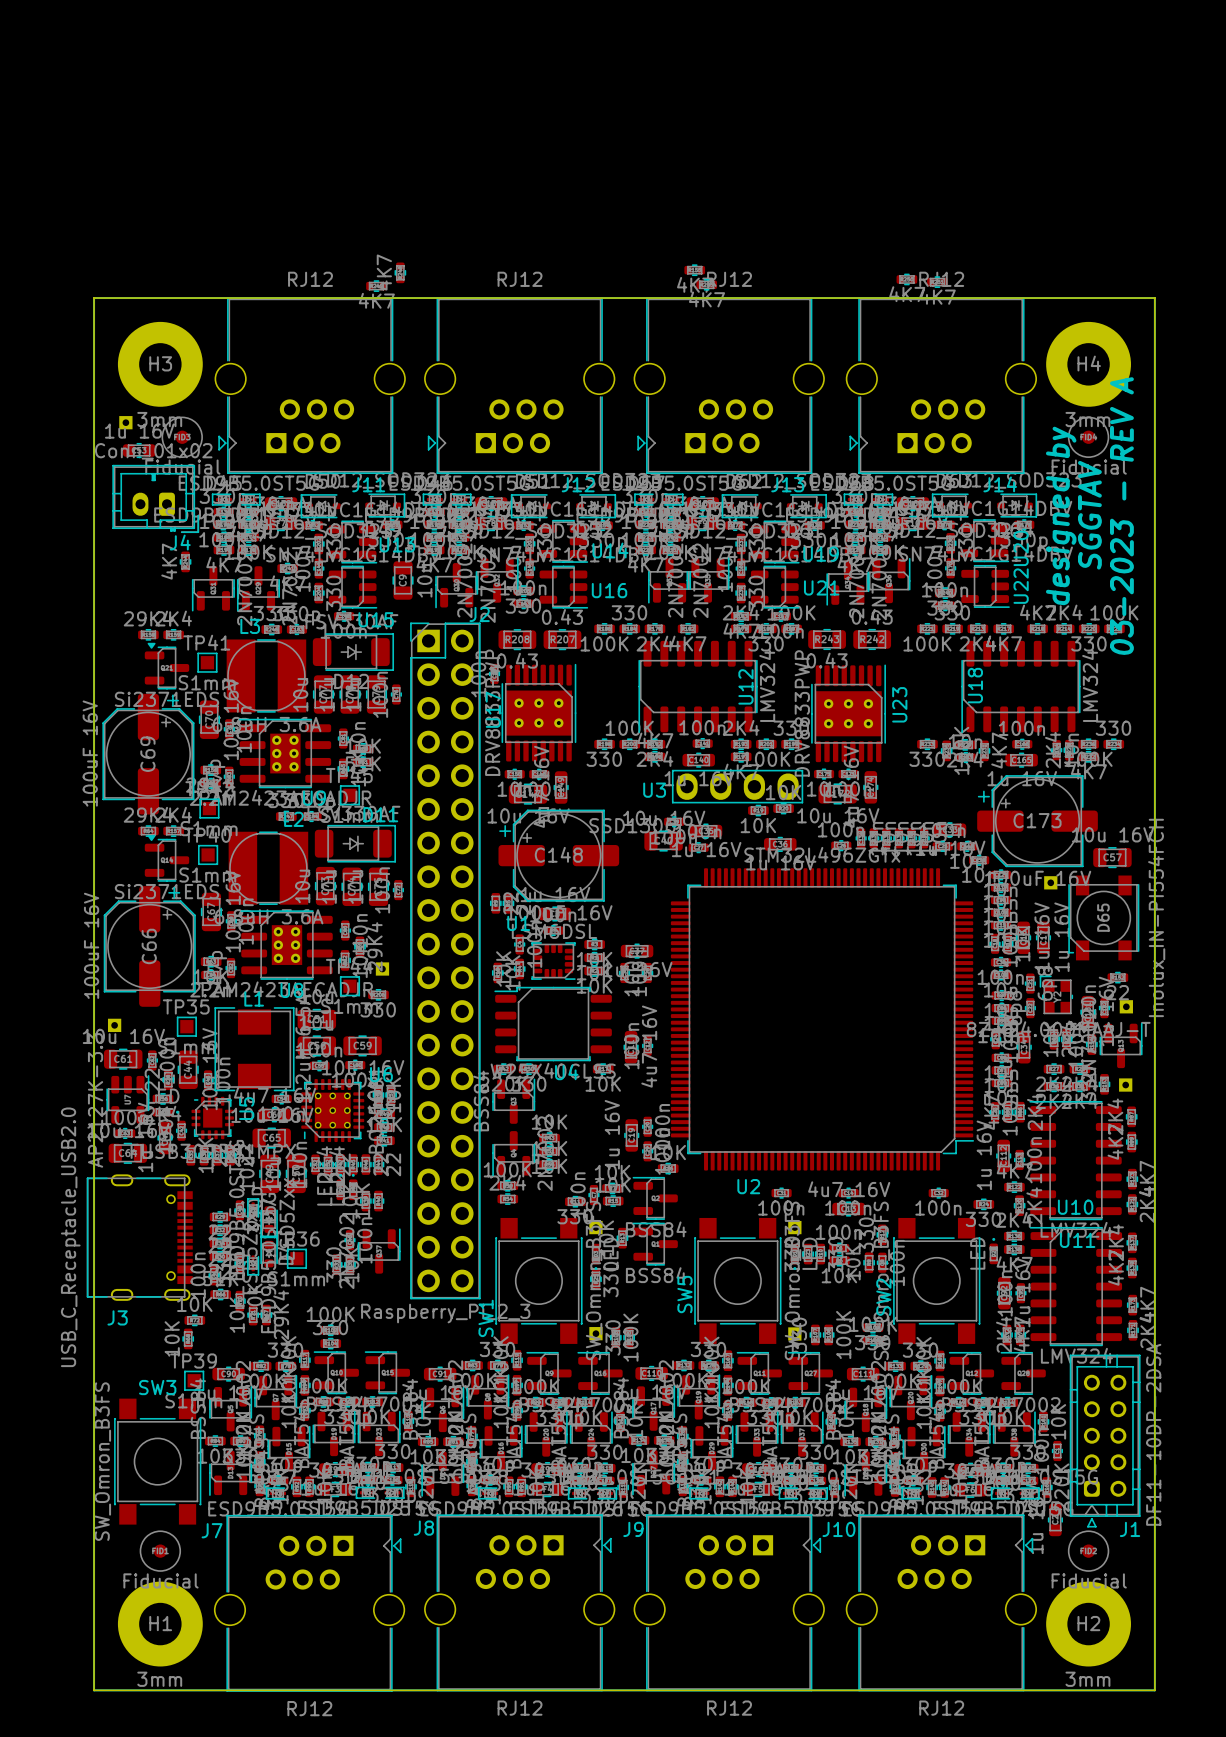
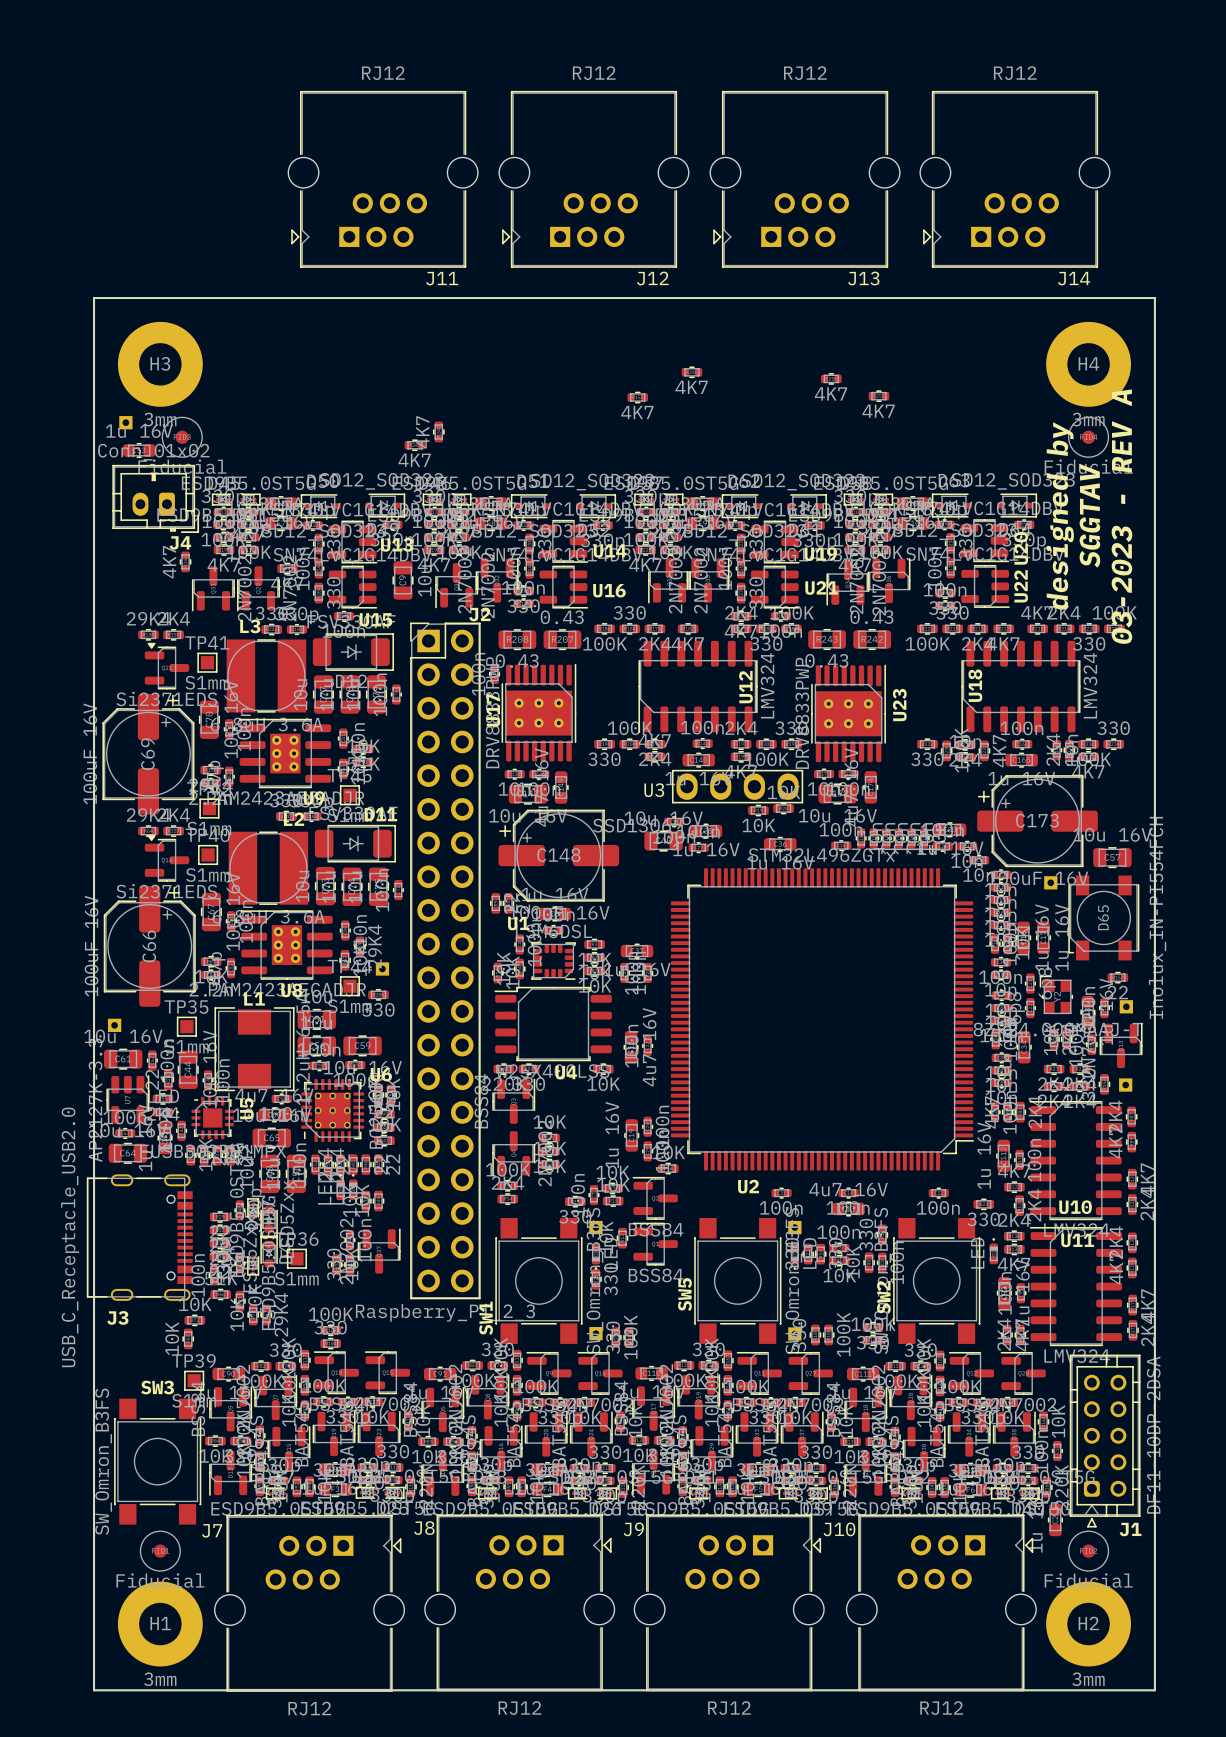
part position: (694, 270) -> (637, 397)
part position: (400, 272) -> (438, 431)
part position: (906, 279) -> (831, 378)
part position: (937, 282) -> (878, 396)
part position: (706, 284) -> (691, 372)
part position: (376, 286) -> (414, 445)
J11 position: (310, 385) -> (383, 179)
J12 position: (519, 385) -> (593, 179)
J13 position: (729, 385) -> (805, 179)
J14 position: (941, 385) -> (1014, 179)

